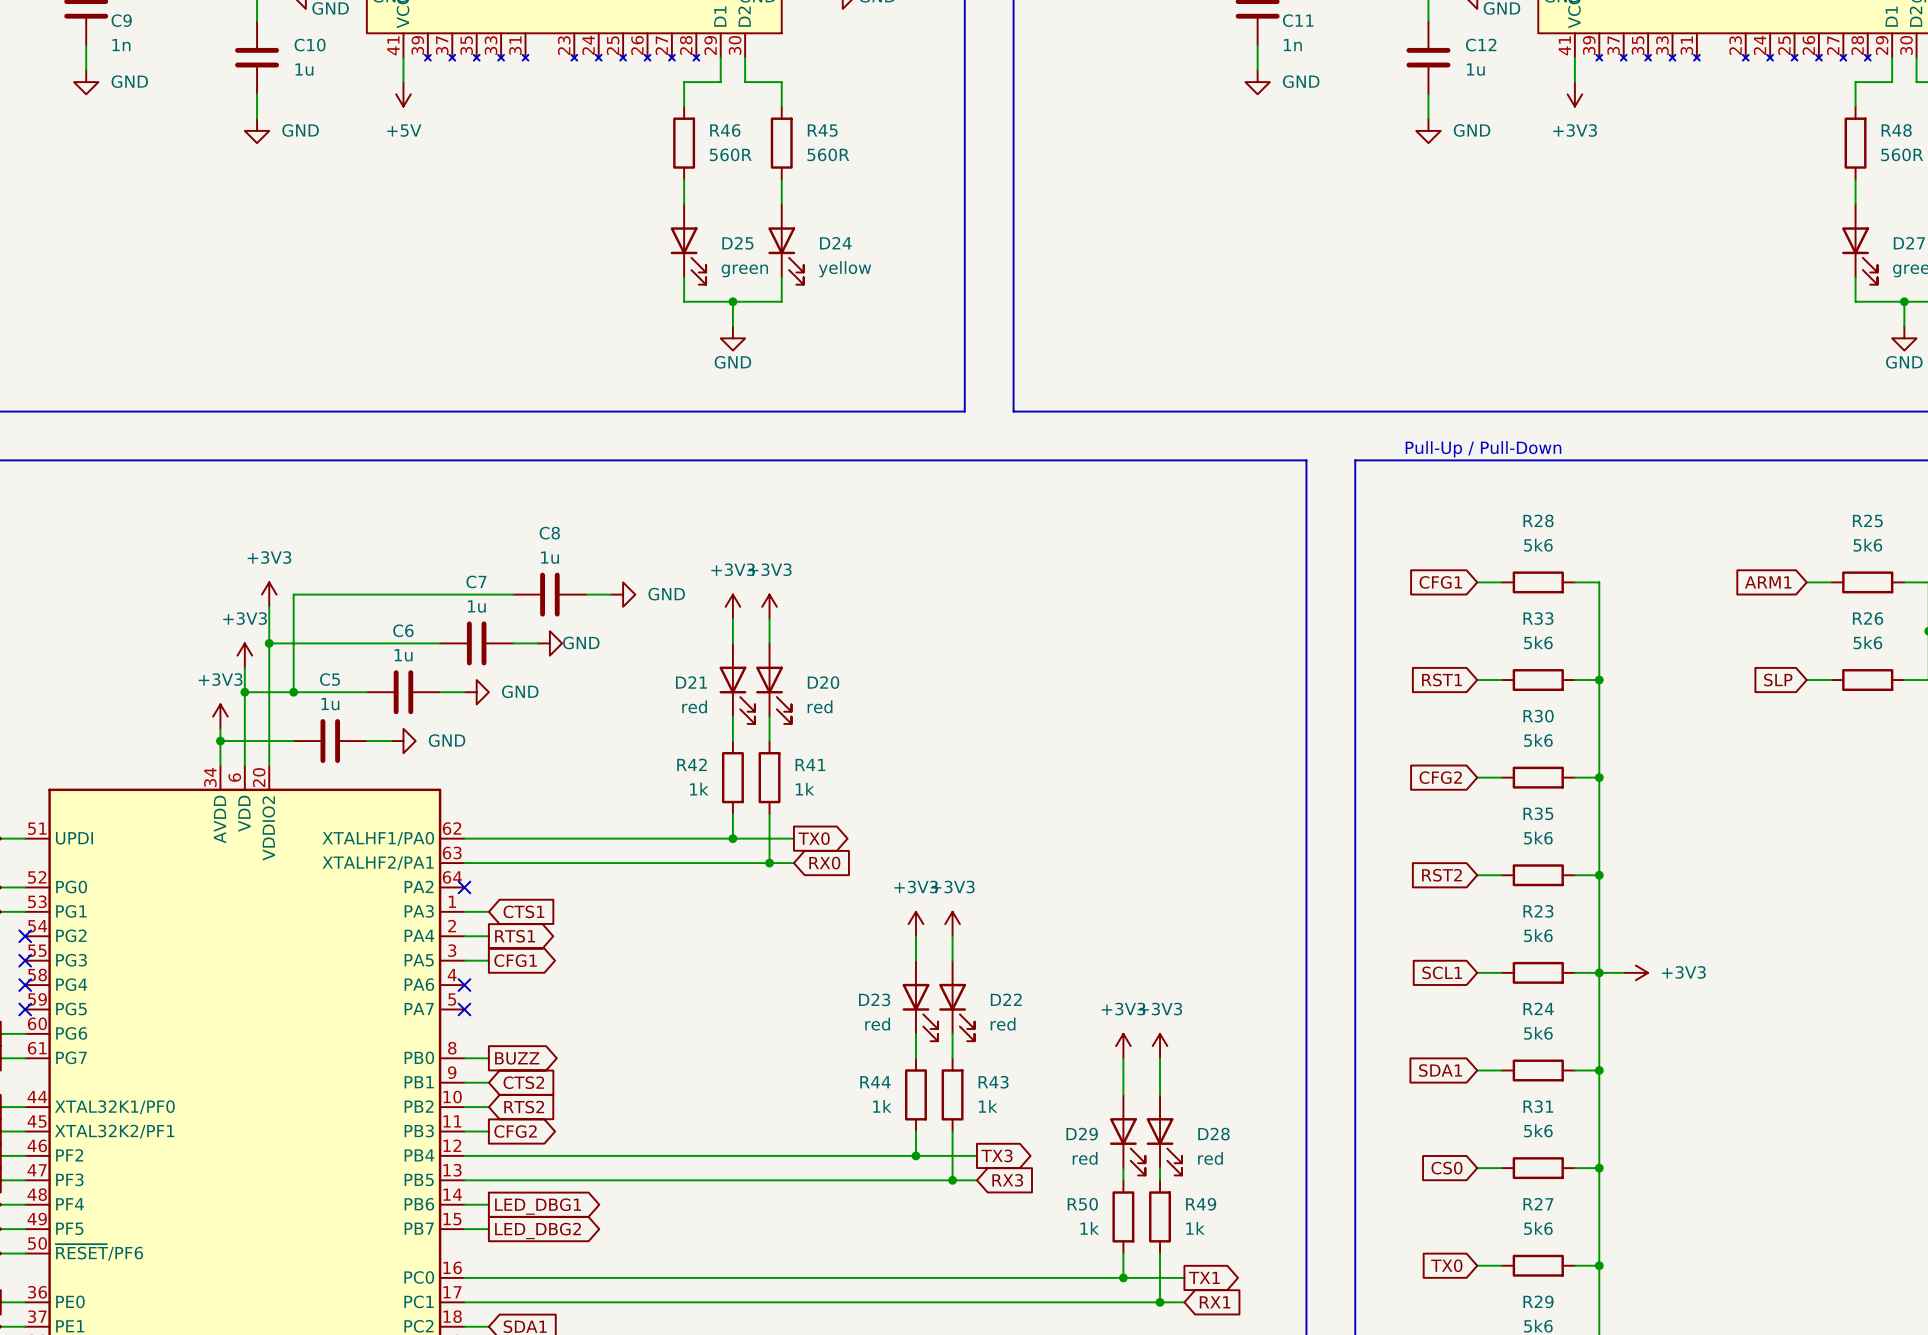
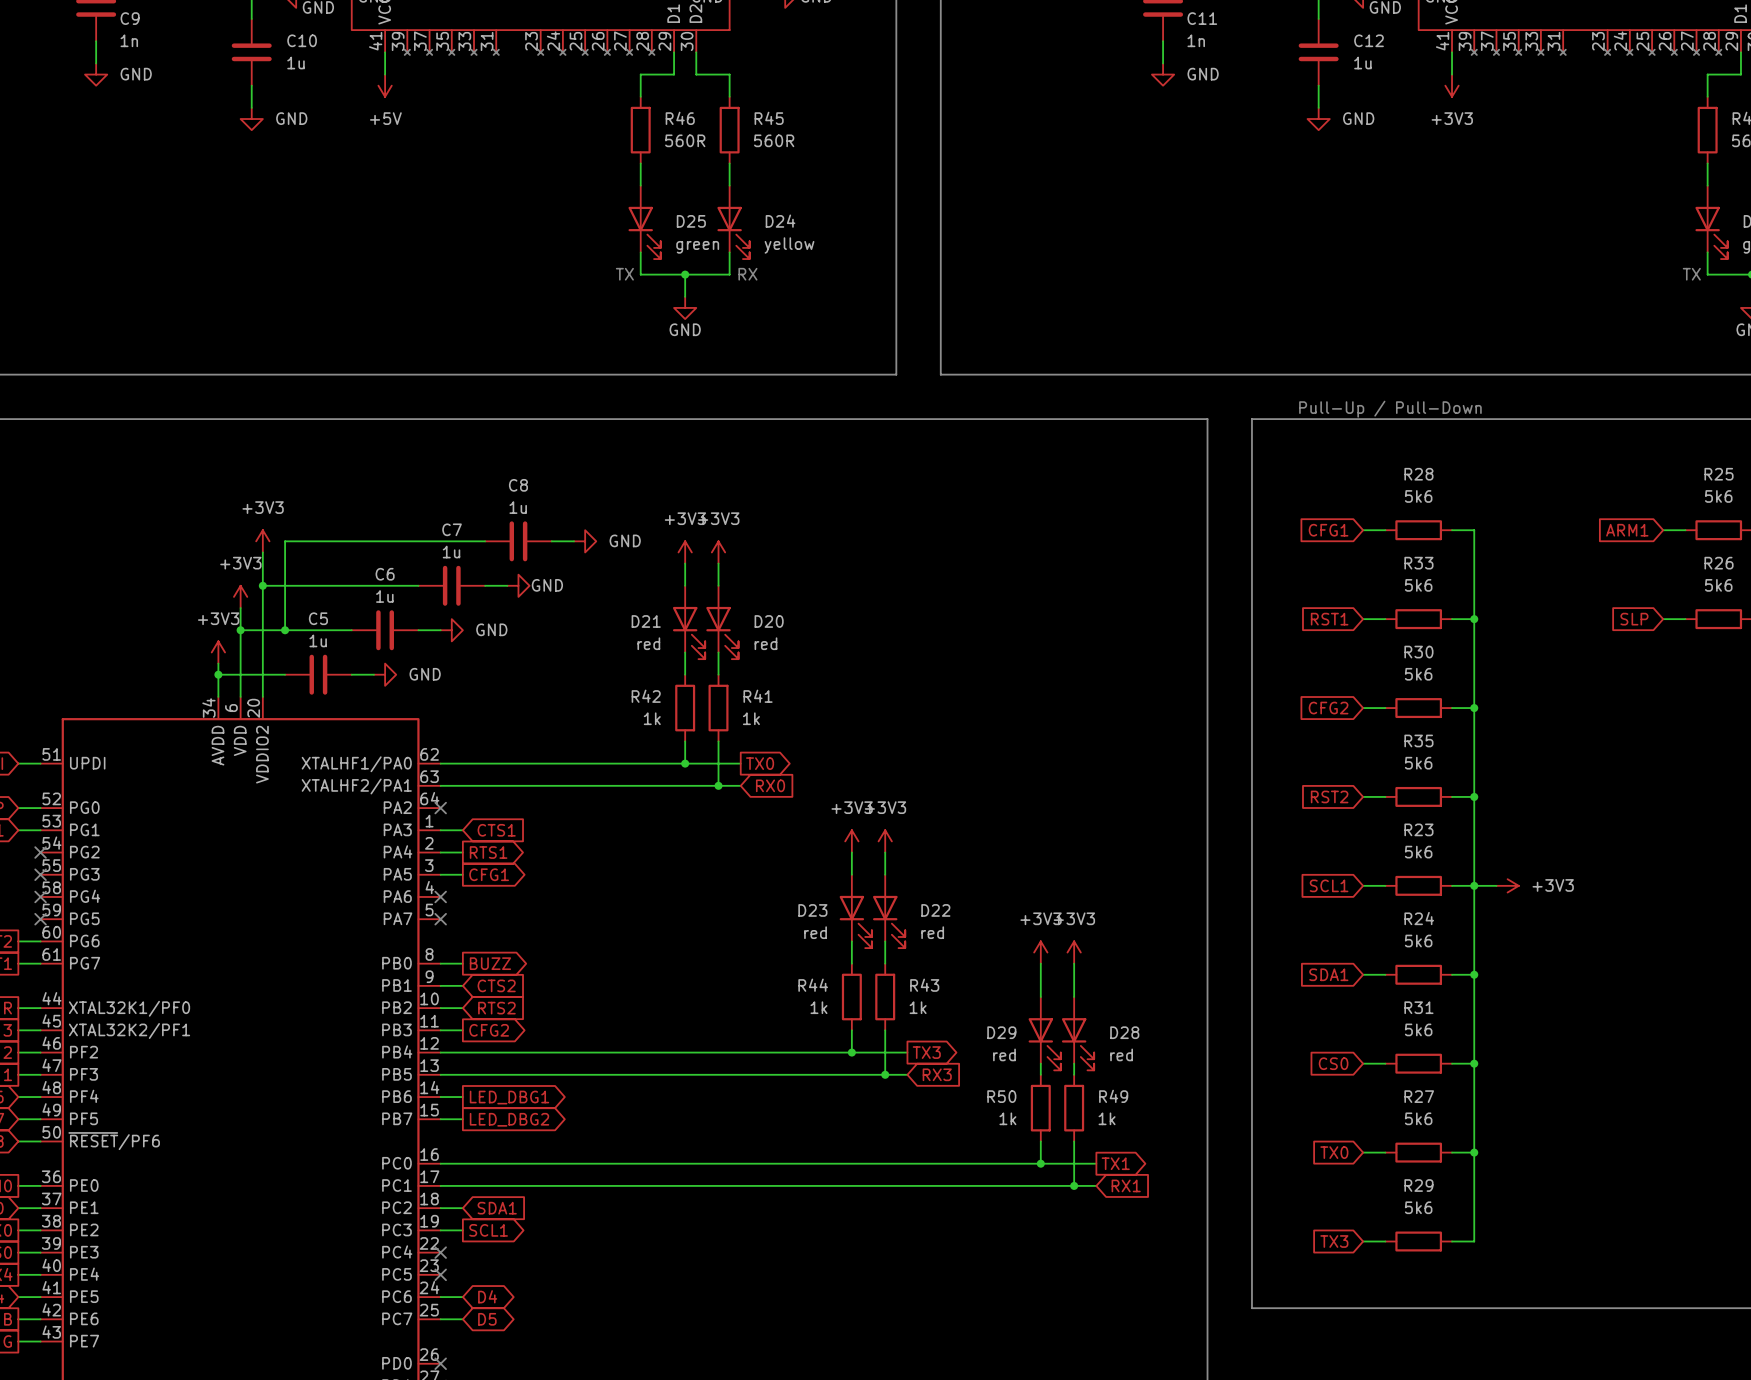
text: none -> TX (624, 274)
text: none -> RX (747, 274)
text: none -> TX (1691, 274)

